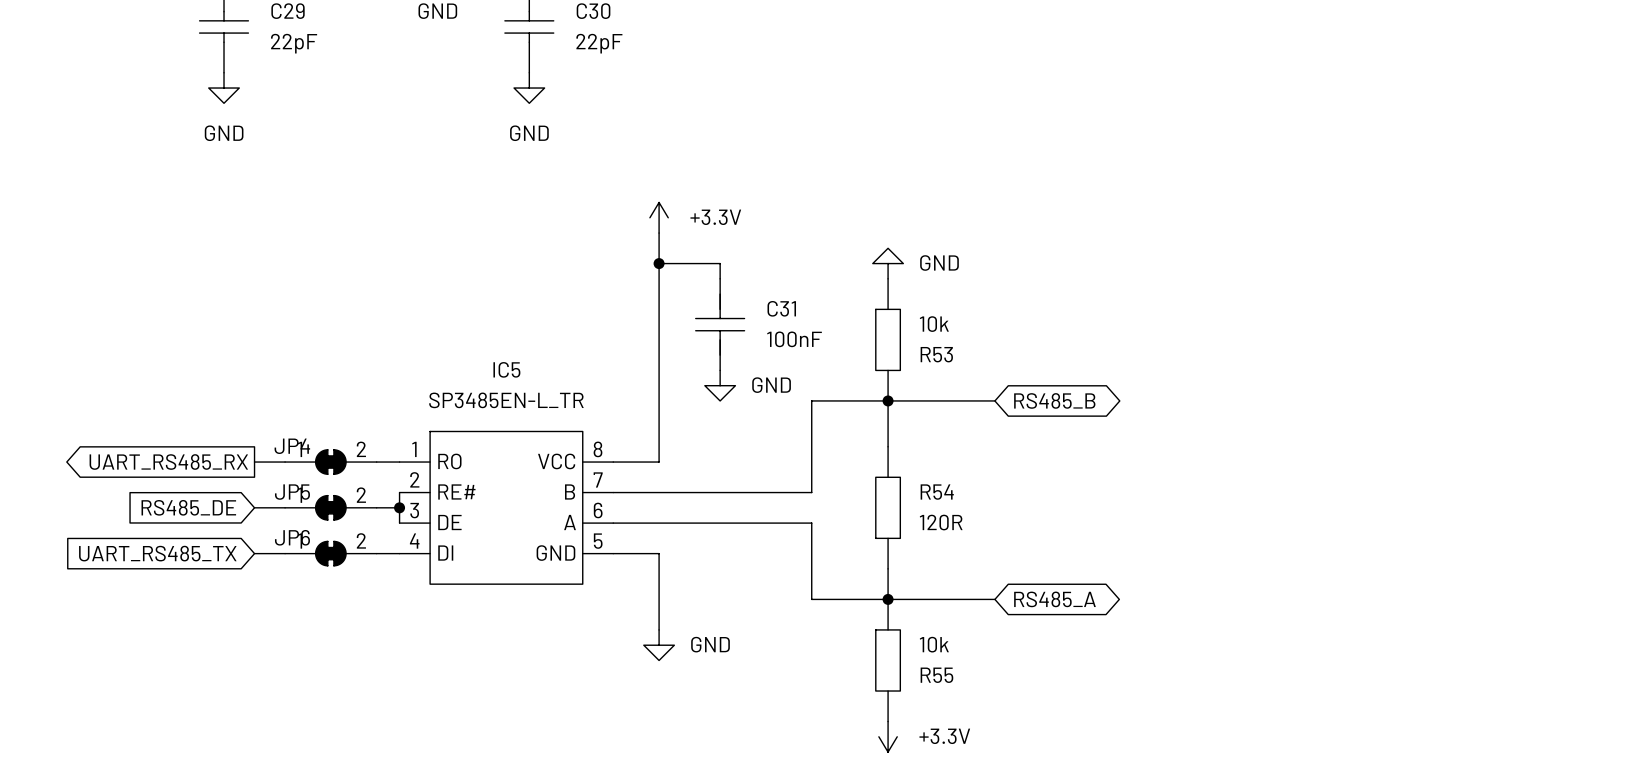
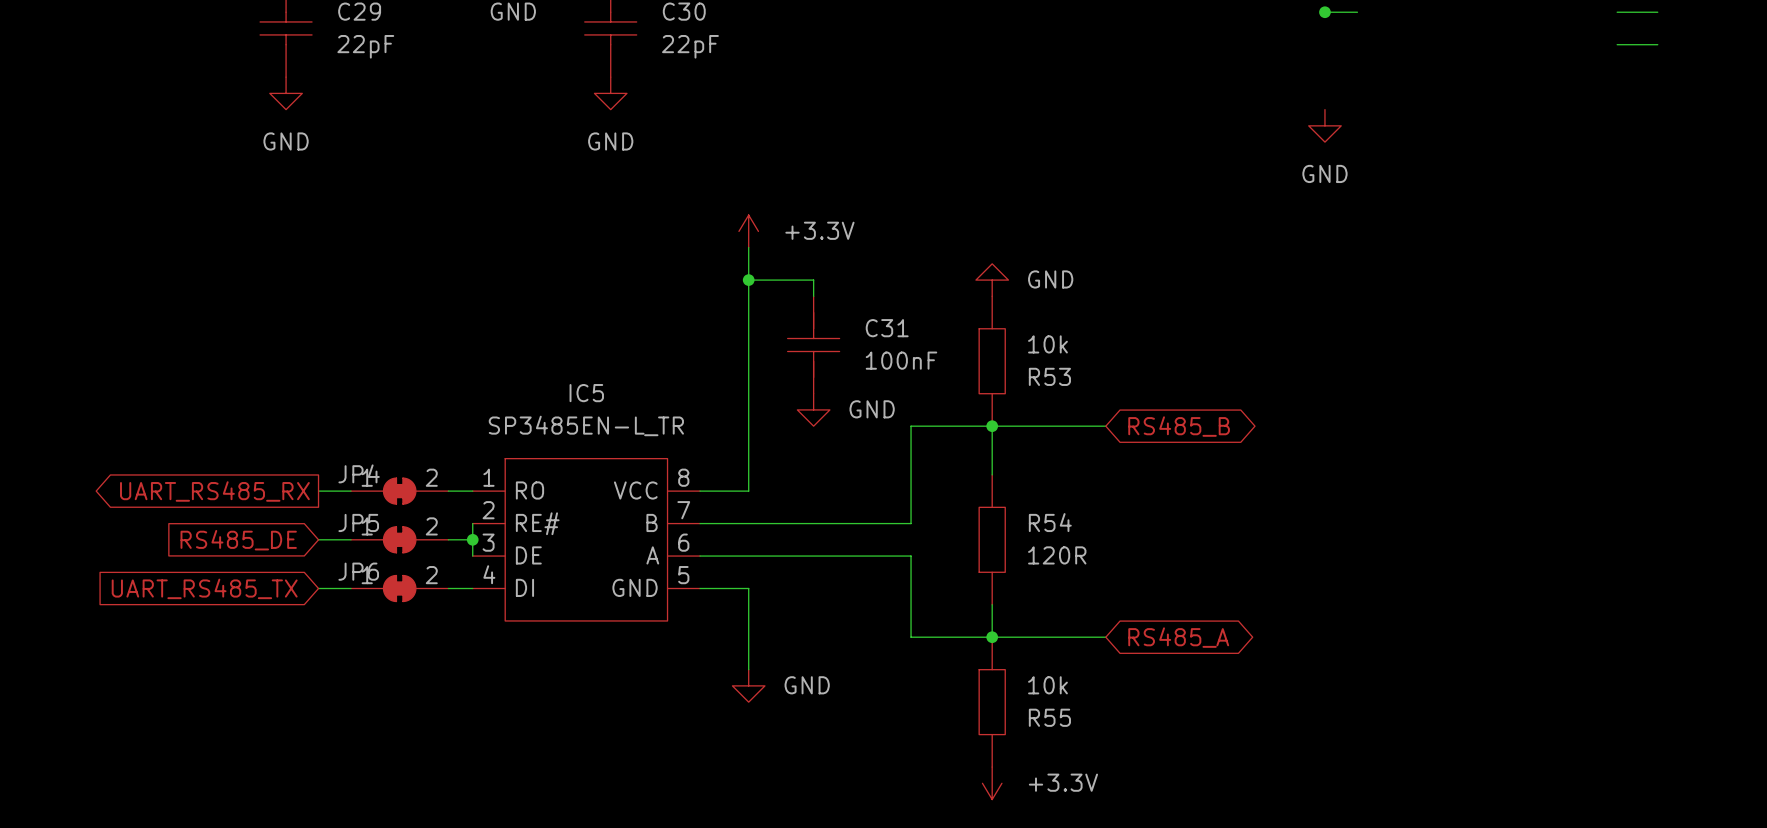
wire: none -> (1324, 12) (1357, 12)
junction: none -> (1324, 12)
wire: none -> (1617, 12) (1657, 12)
wire: none -> (1617, 44) (1657, 44)
power symbol: none -> GND (1324, 125)

